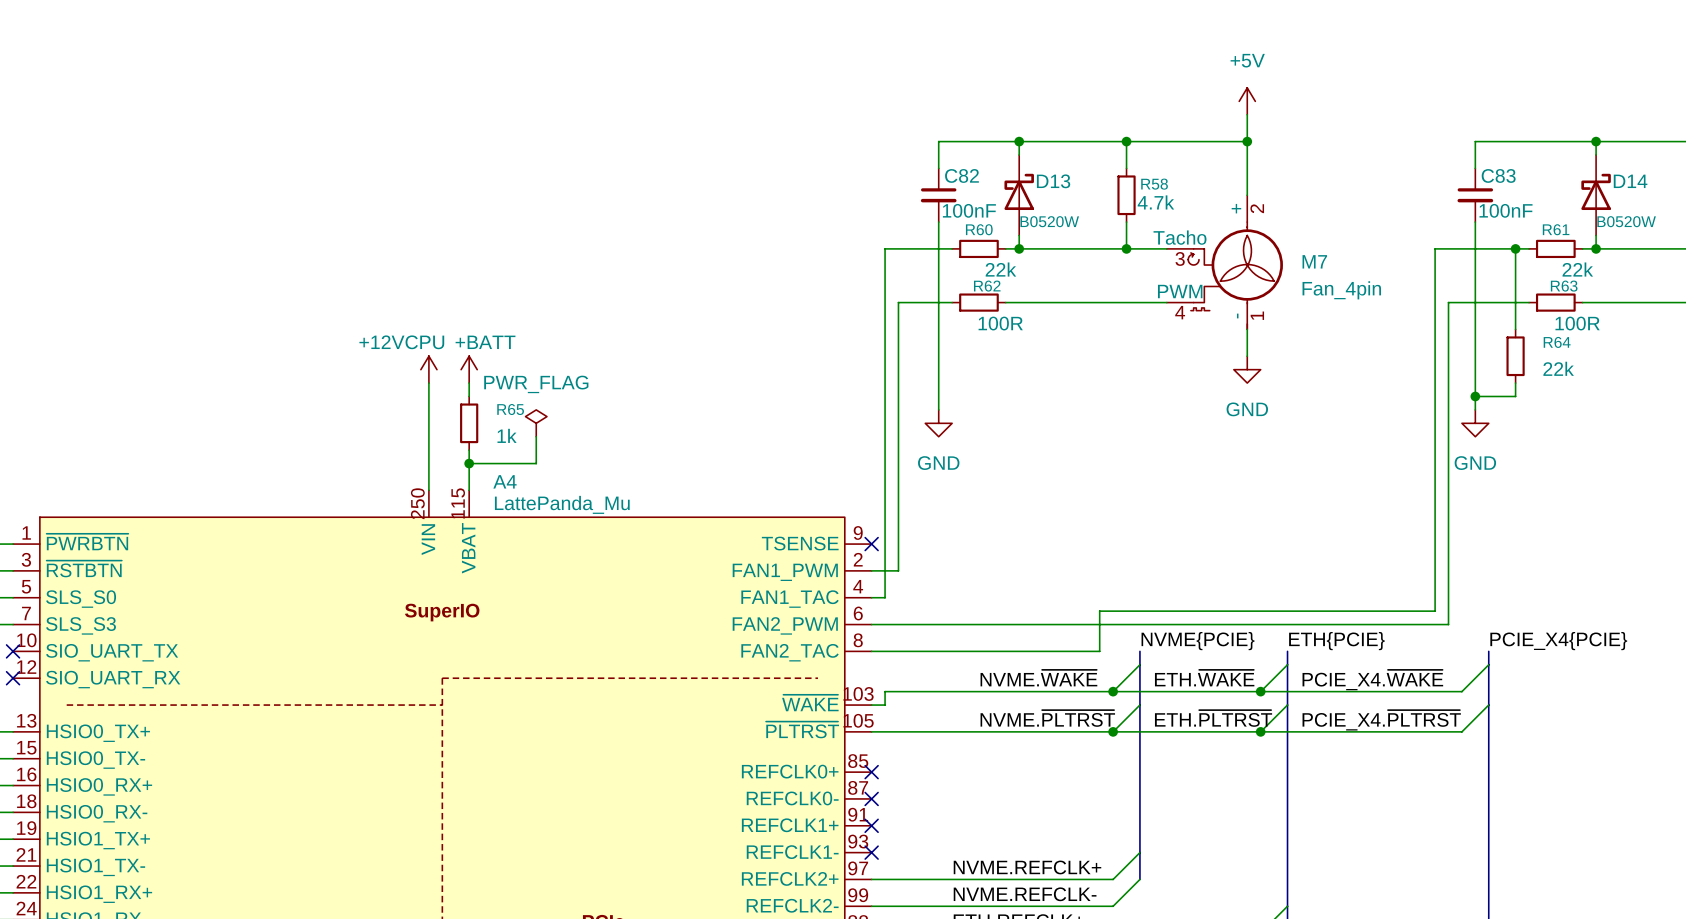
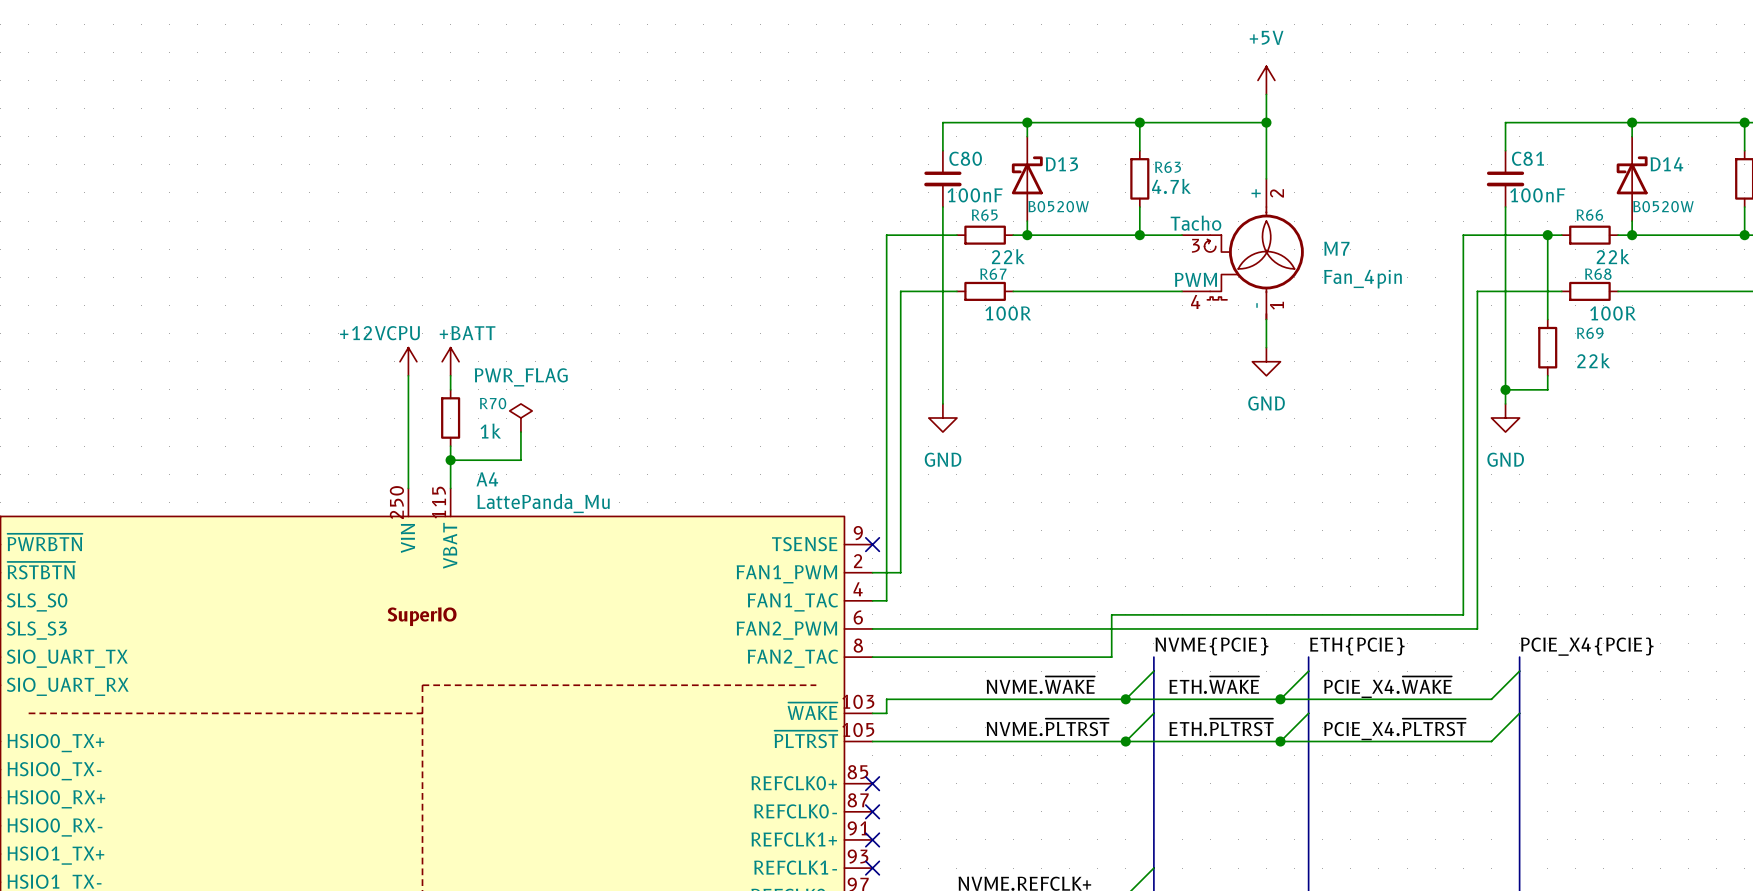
C82 name: C82 (961, 175) -> C80 (965, 158)
C83 name: C83 (1498, 175) -> C81 (1528, 158)
R58 name: R58 (1154, 184) -> R63 (1168, 167)
R60 name: R60 (979, 229) -> R65 (984, 215)
R61 name: R61 (1556, 229) -> R66 (1589, 215)
R62 name: R62 (987, 286) -> R67 (993, 274)
R63 name: R63 (1564, 286) -> R68 (1598, 274)
R64 name: R64 (1557, 342) -> R69 (1590, 333)
R65 name: R65 (510, 409) -> R70 (493, 403)

